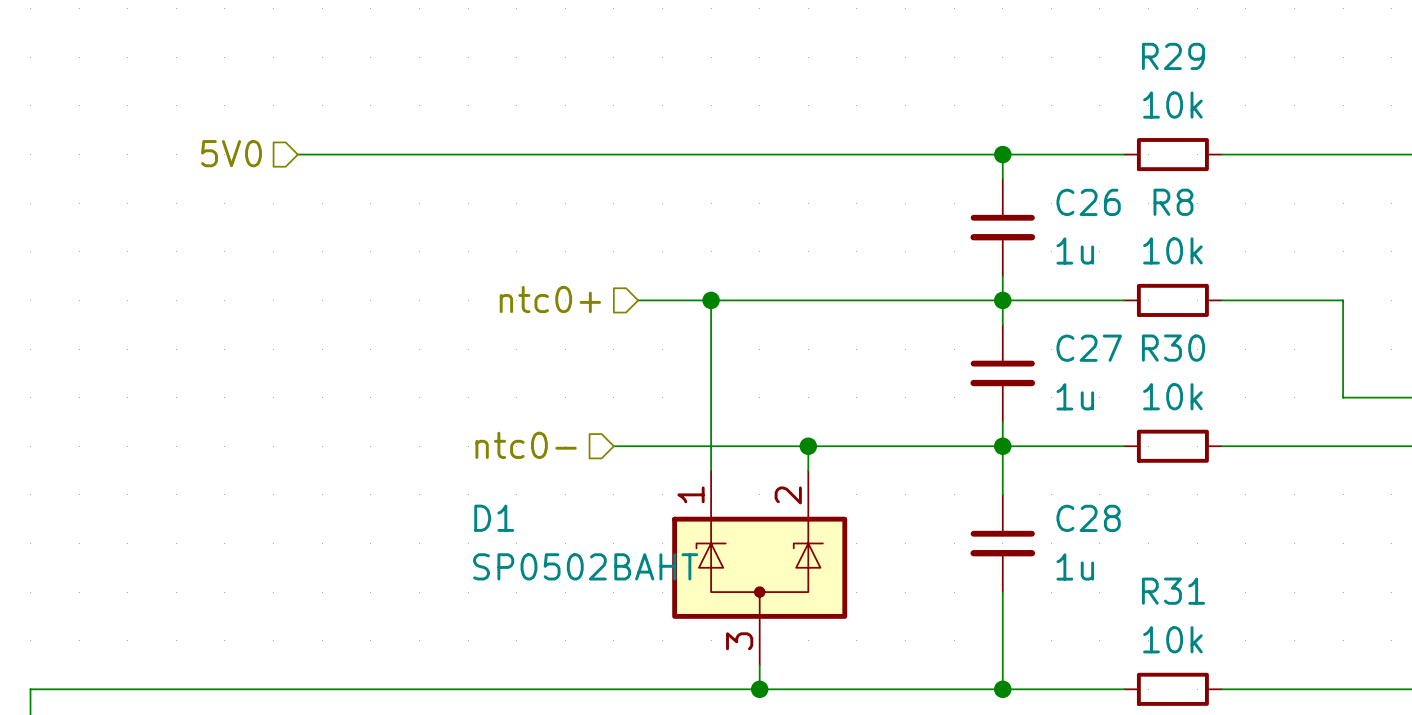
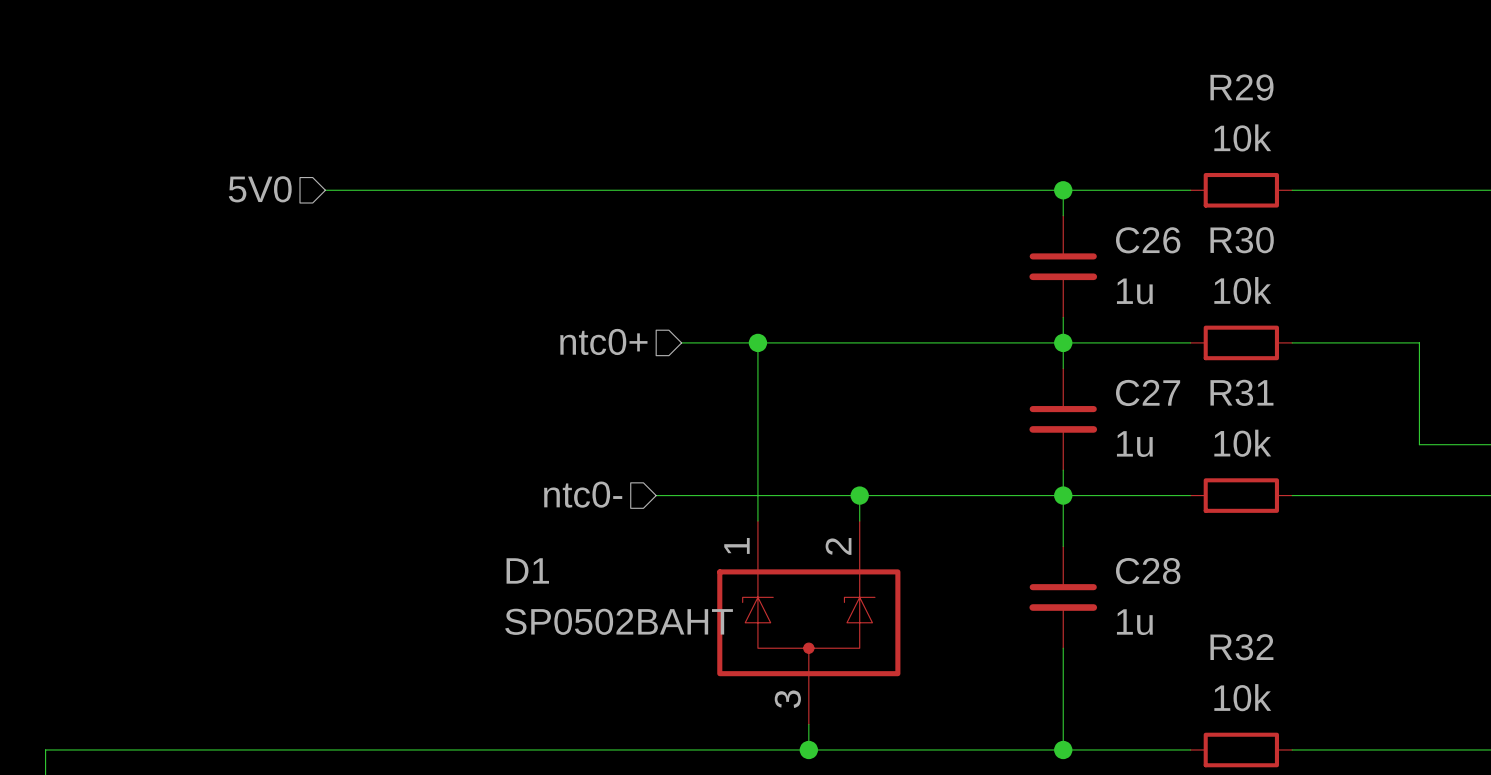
R8 name: R8 (1173, 202) -> R30 (1242, 240)
R30 name: R30 (1173, 348) -> R31 (1241, 392)
R31 name: R31 (1173, 591) -> R32 (1241, 647)

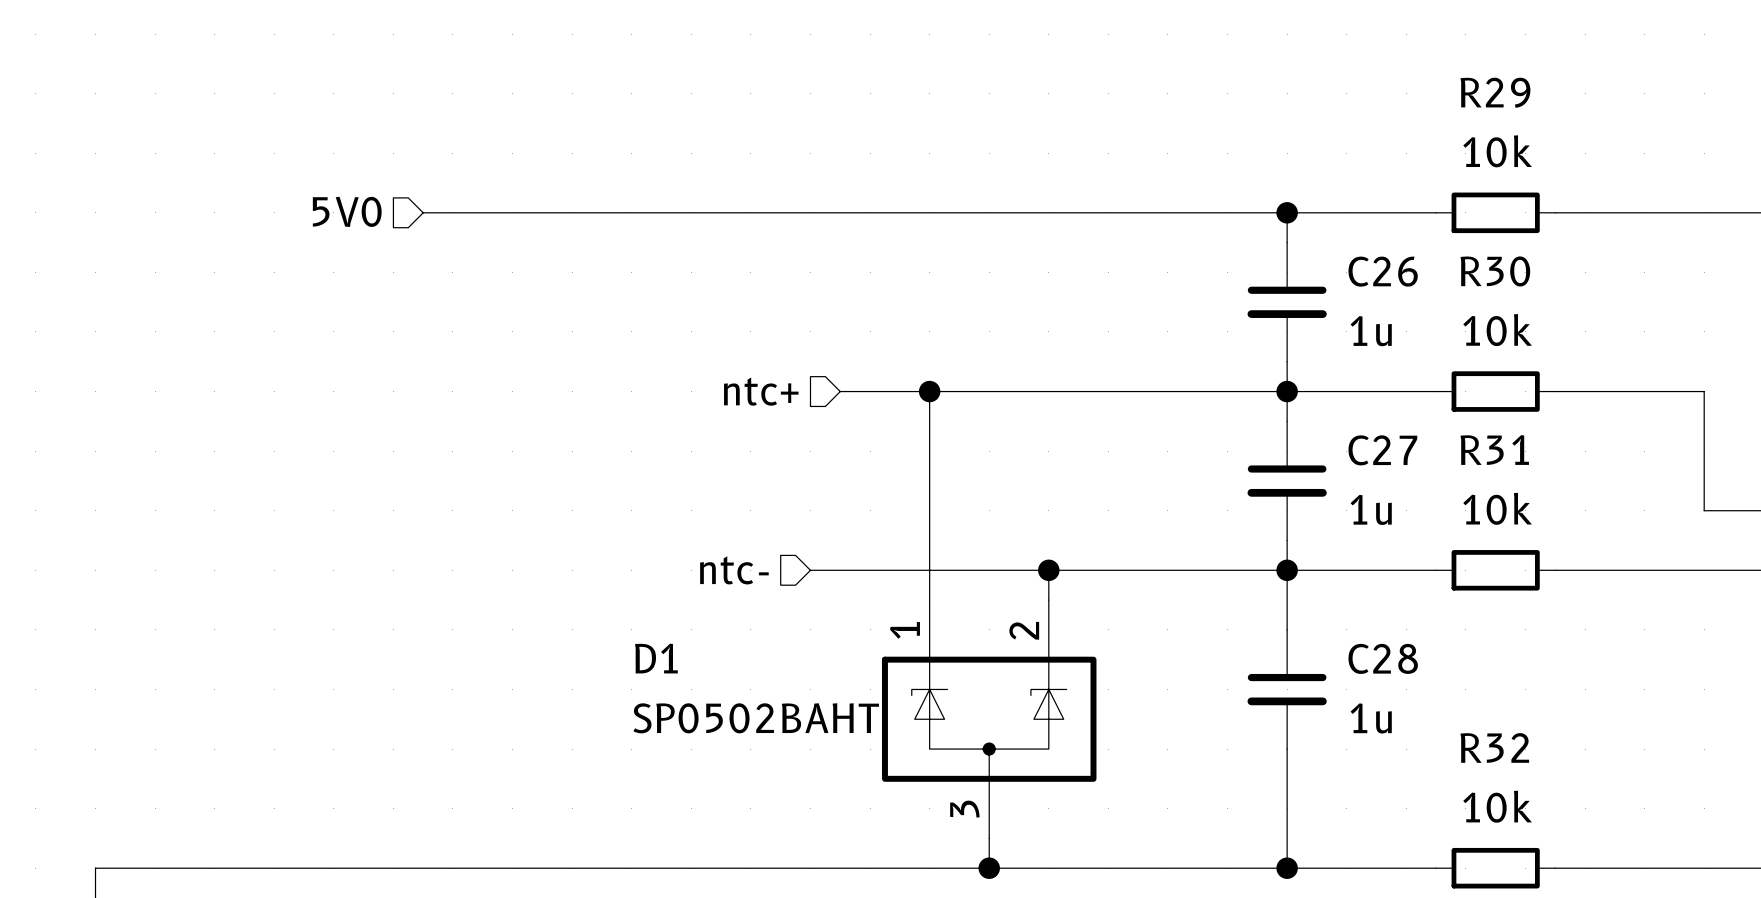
hierarchical label: ntc0+ (603, 341) -> ntc+ (761, 391)
hierarchical label: ntc0- (583, 494) -> ntc- (734, 570)

